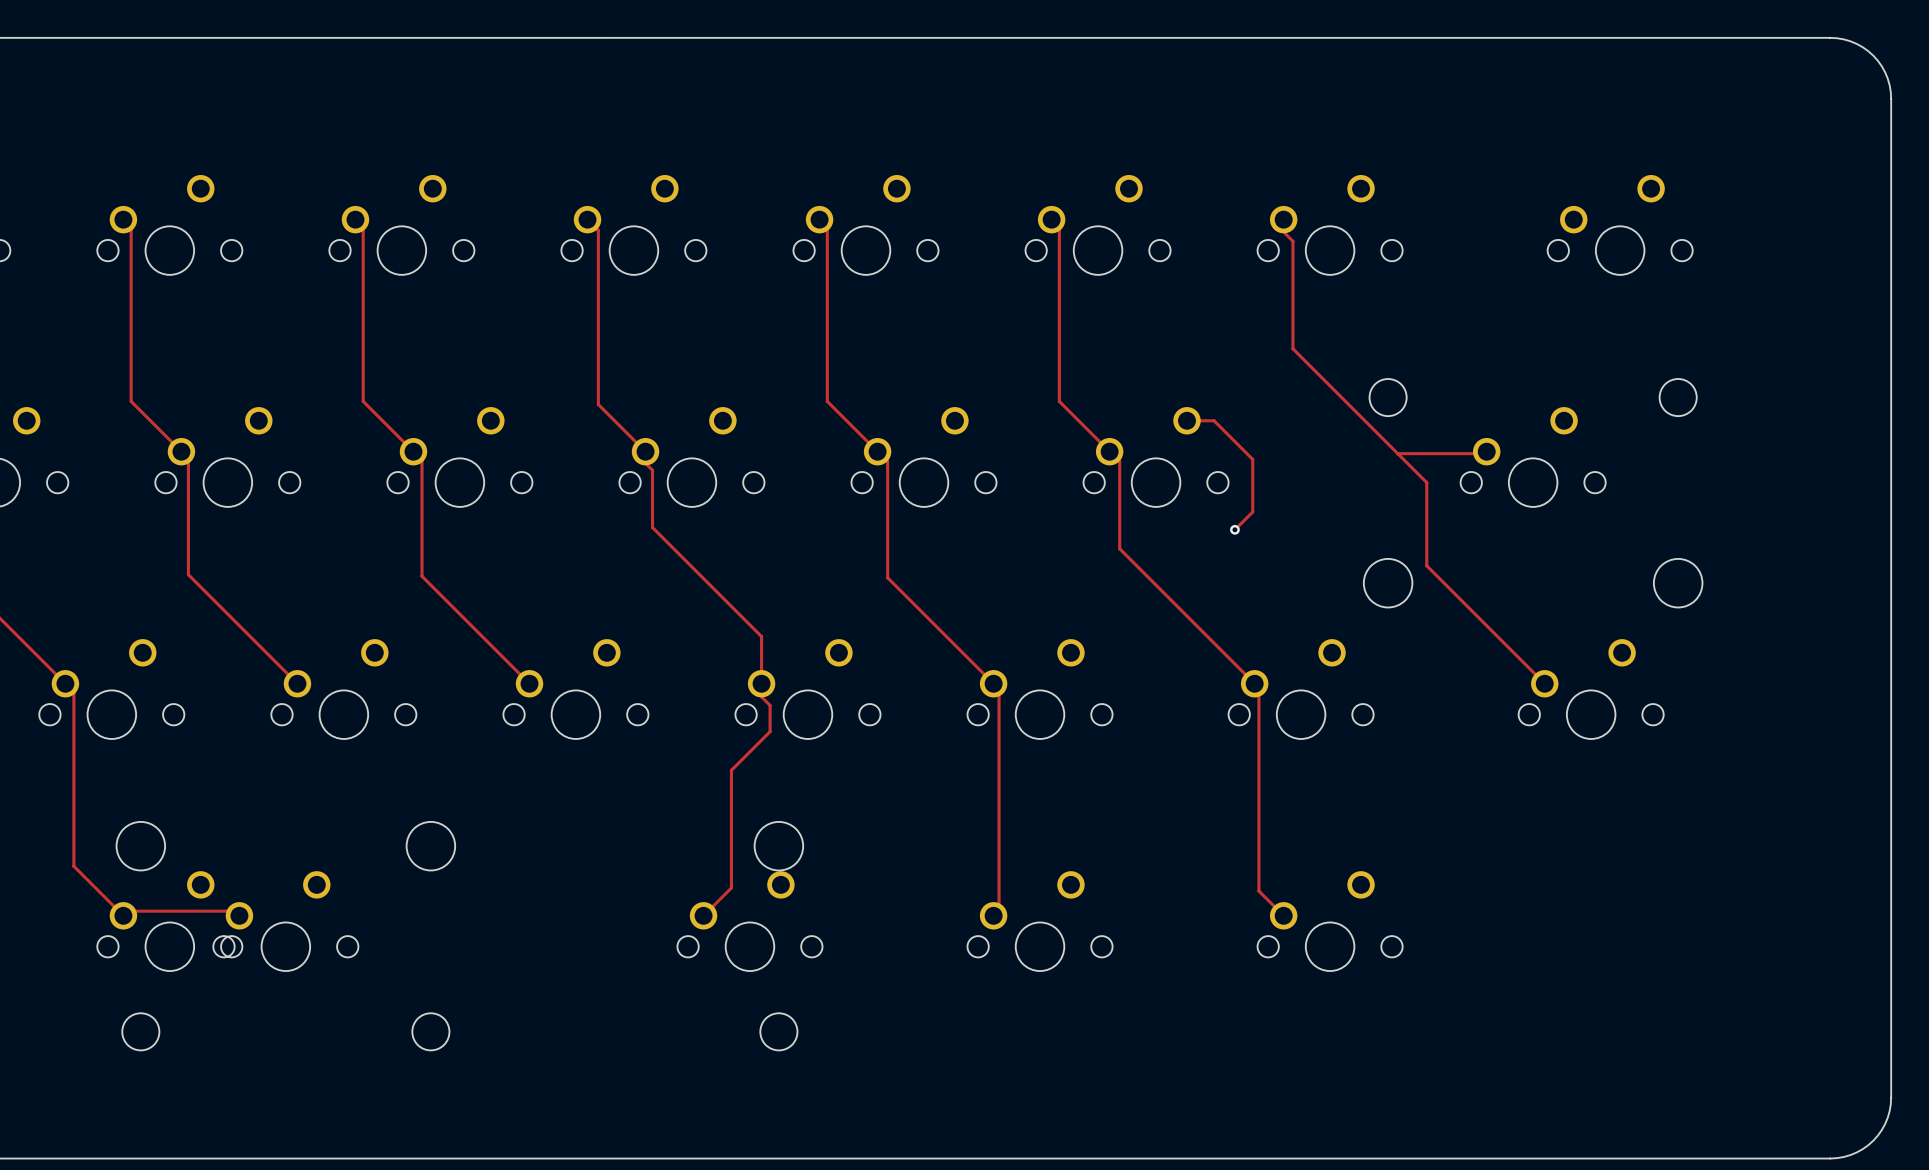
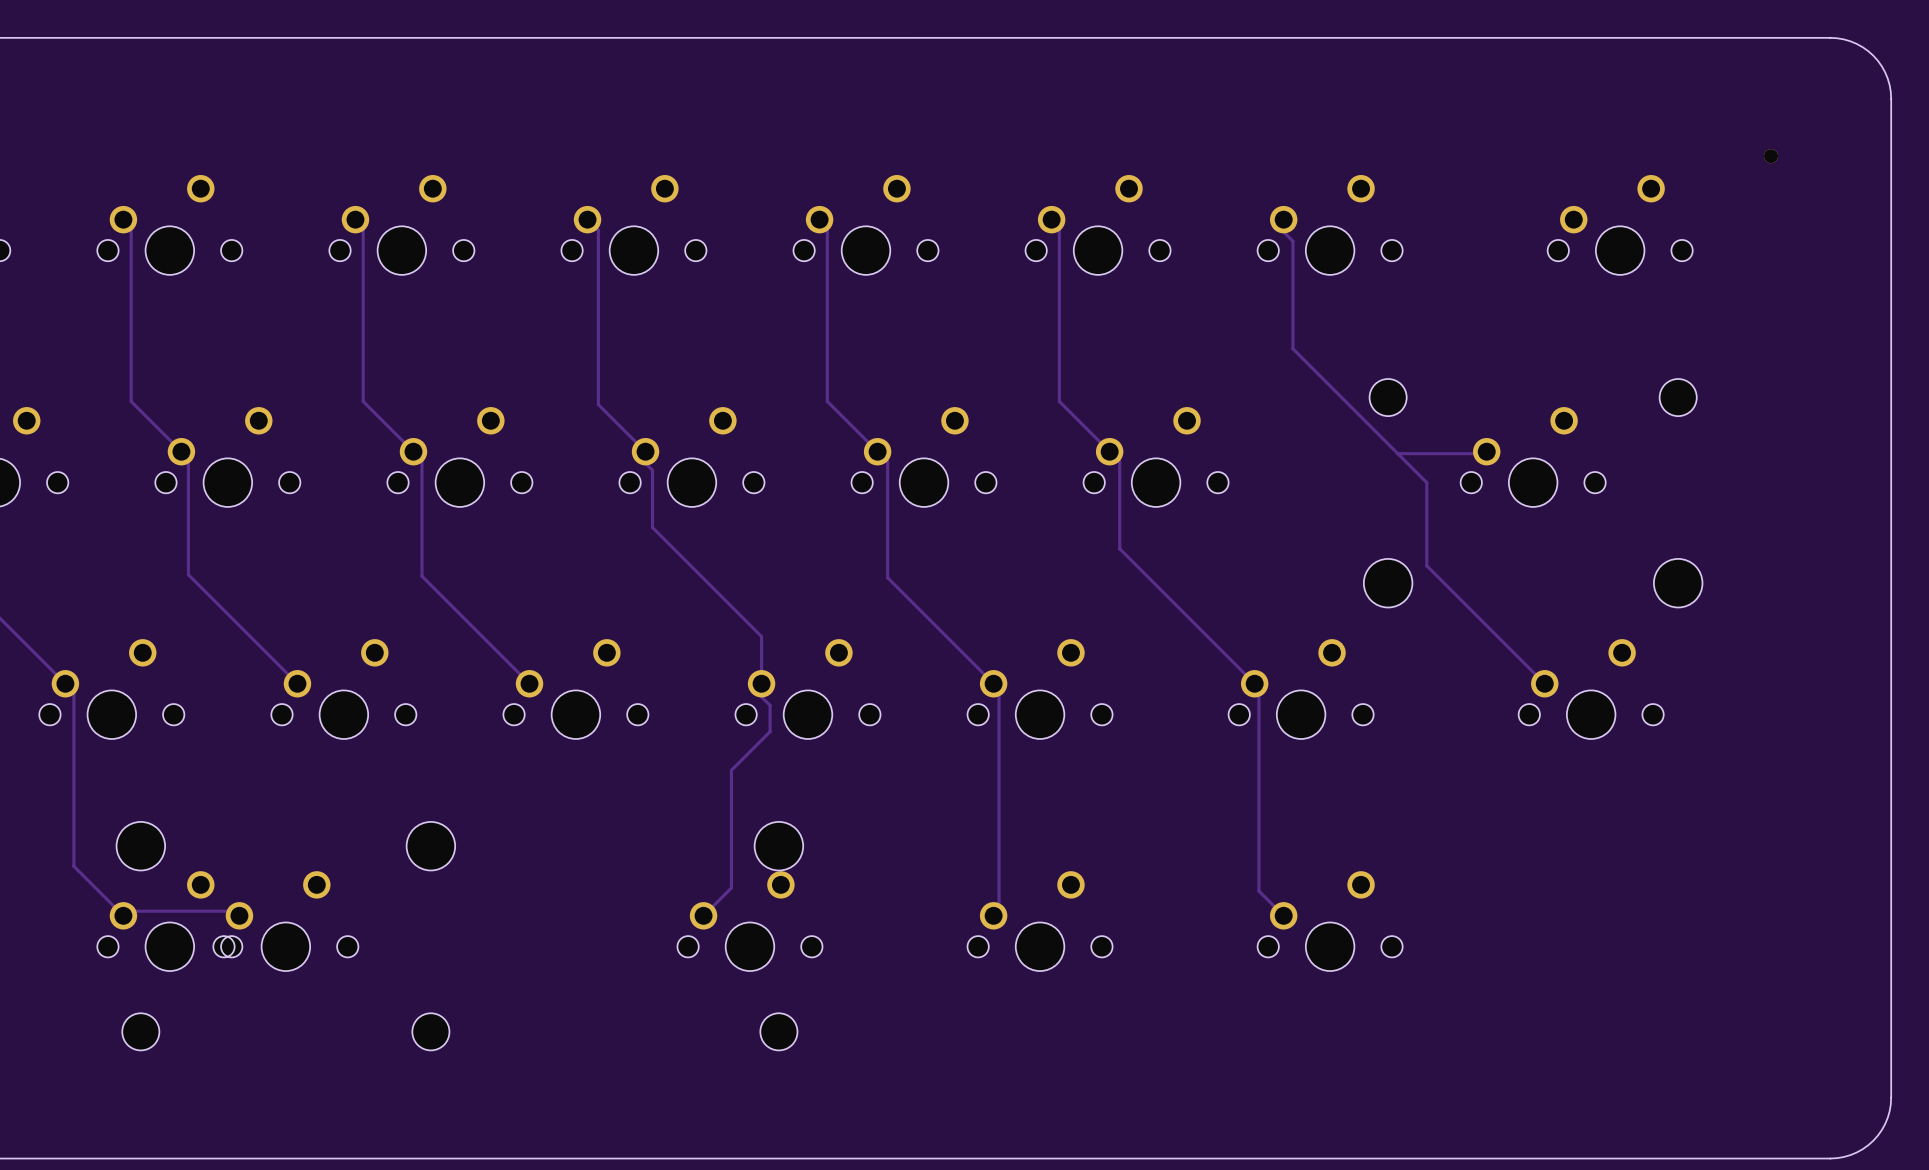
part: none -> (1771, 156)
track: (1187, 420) (1214, 420) (1252, 459) (1252, 511) (1234, 529) -> none
via: (1234, 529) -> none

